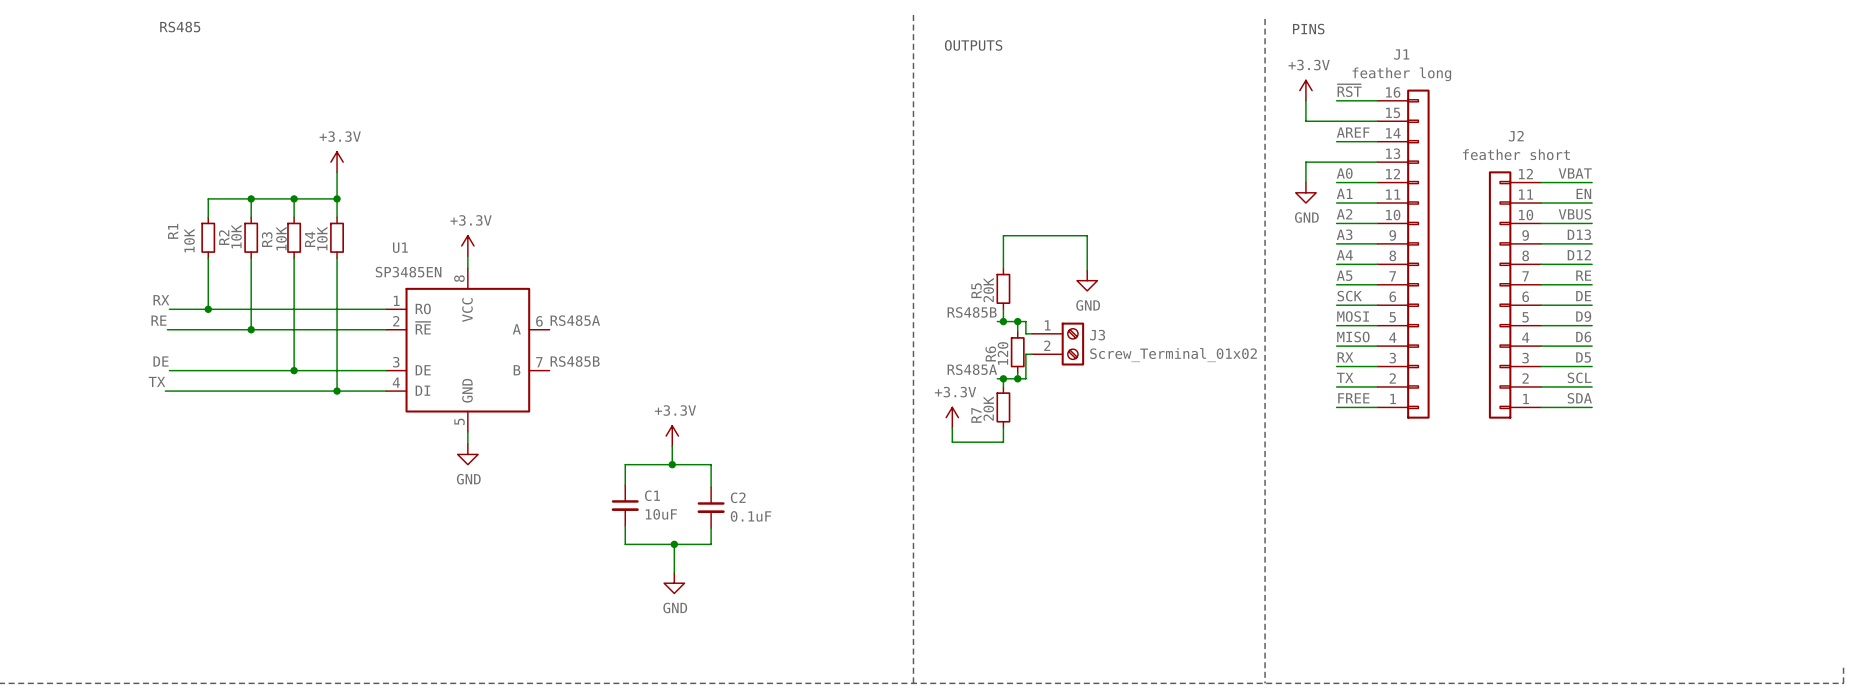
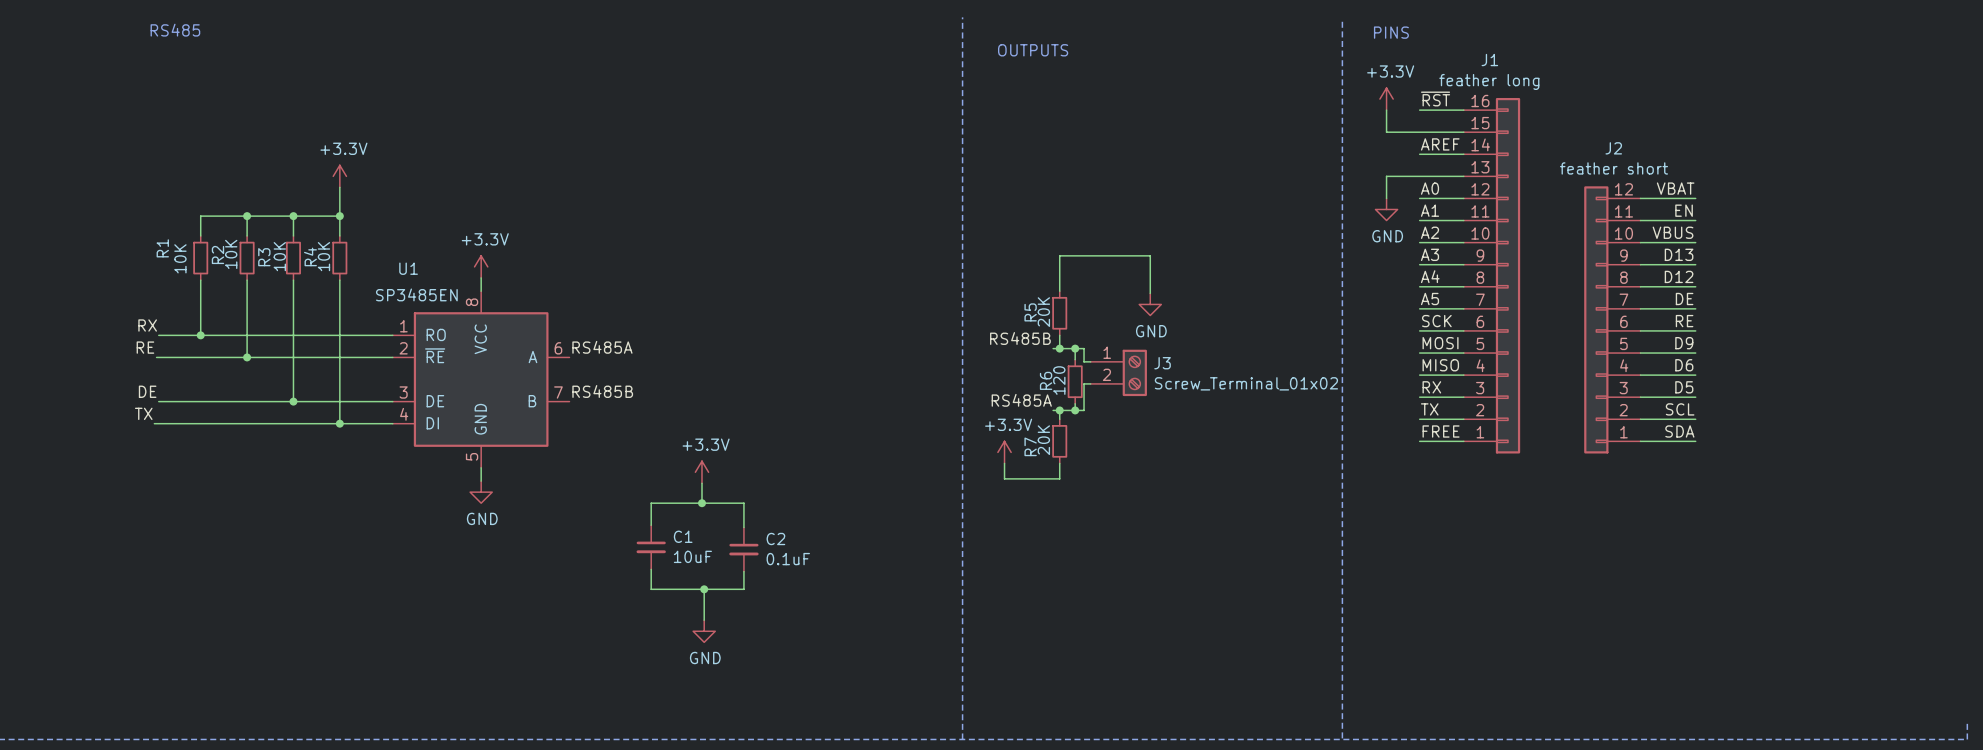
label: RE (1583, 275) -> DE (1684, 299)
label: DE (1583, 296) -> RE (1684, 321)

